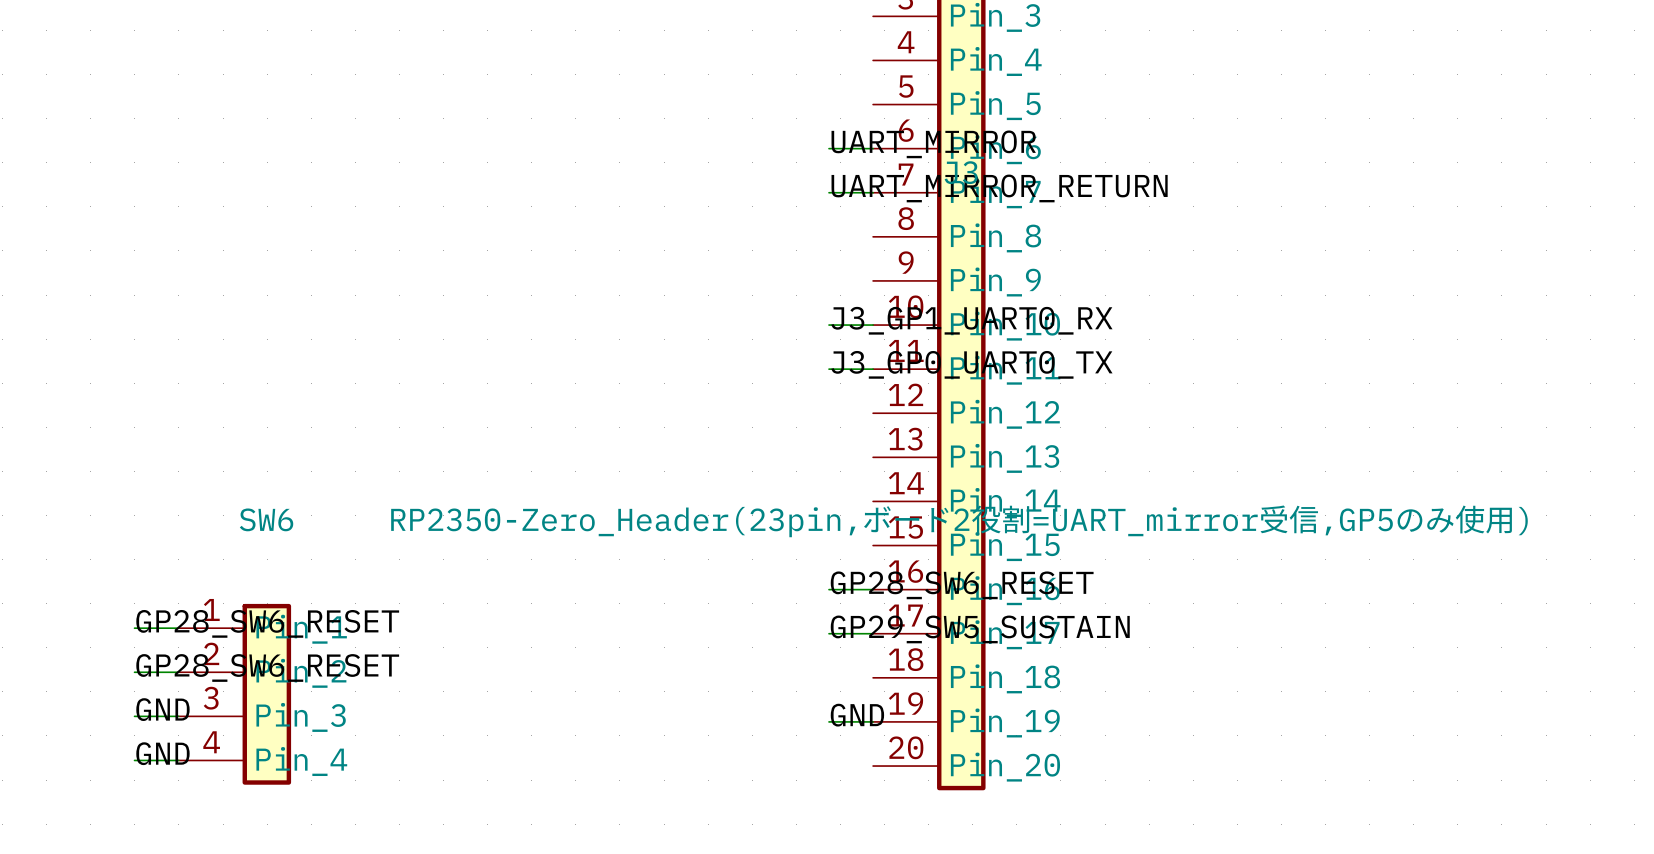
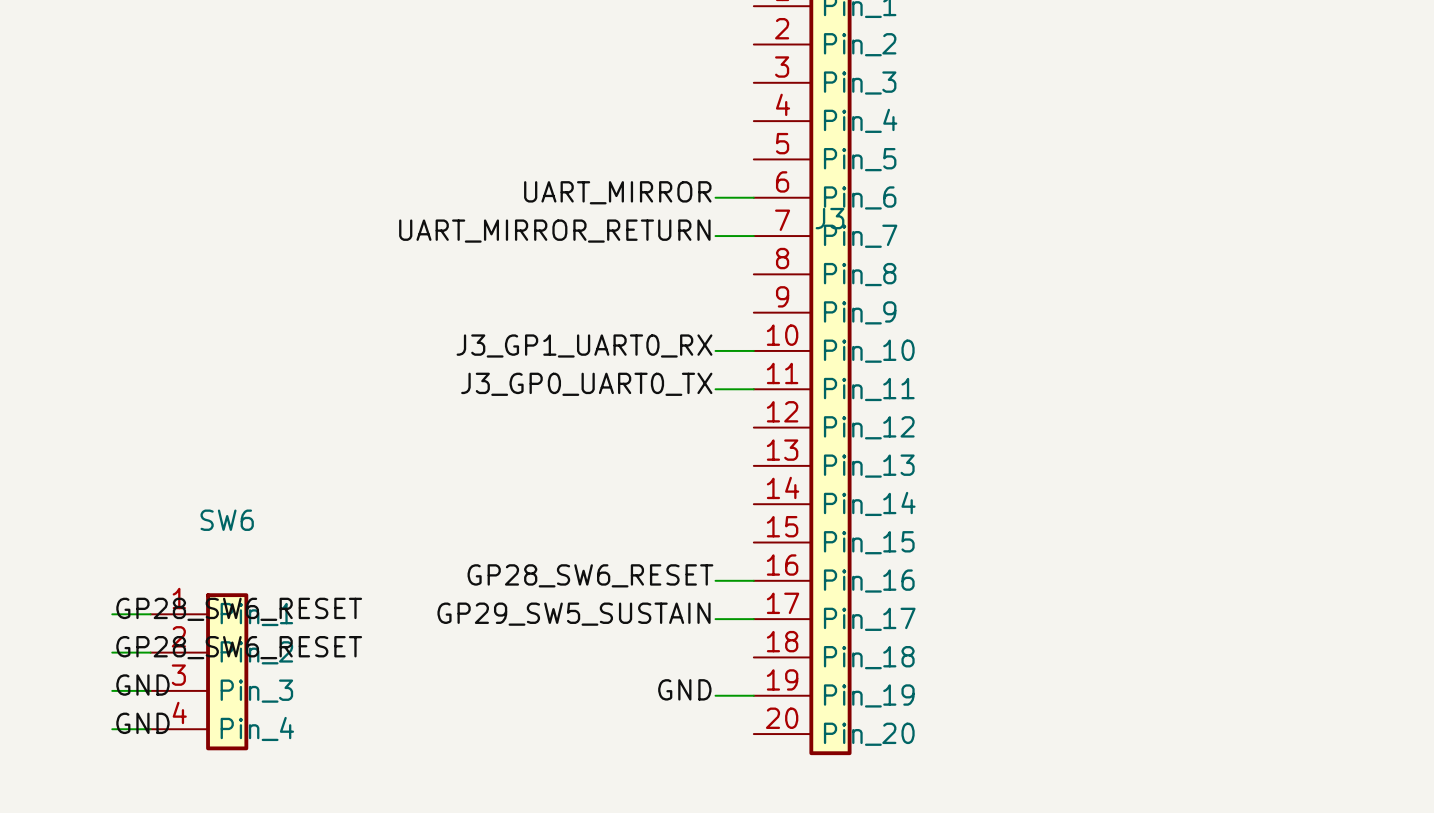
label position: UART_MIRROR (933, 144) -> UART_MIRROR (617, 192)
label position: UART_MIRROR_RETURN (999, 188) -> UART_MIRROR_RETURN (554, 231)
label position: J3_GP1_UART0_RX (971, 320) -> J3_GP1_UART0_RX (584, 345)
label position: J3_GP0_UART0_TX (971, 364) -> J3_GP0_UART0_TX (586, 384)
J3 value: RP2350-Zero_Header(23pin,ボード2役割=UART_mirror受信,GP5のみ使用) (959, 521) -> none
label position: GP28_SW6_RESET (962, 585) -> GP28_SW6_RESET (590, 575)
label position: GP29_SW5_SUSTAIN (980, 629) -> GP29_SW5_SUSTAIN (574, 614)
label position: GND (857, 715) -> GND (684, 689)

